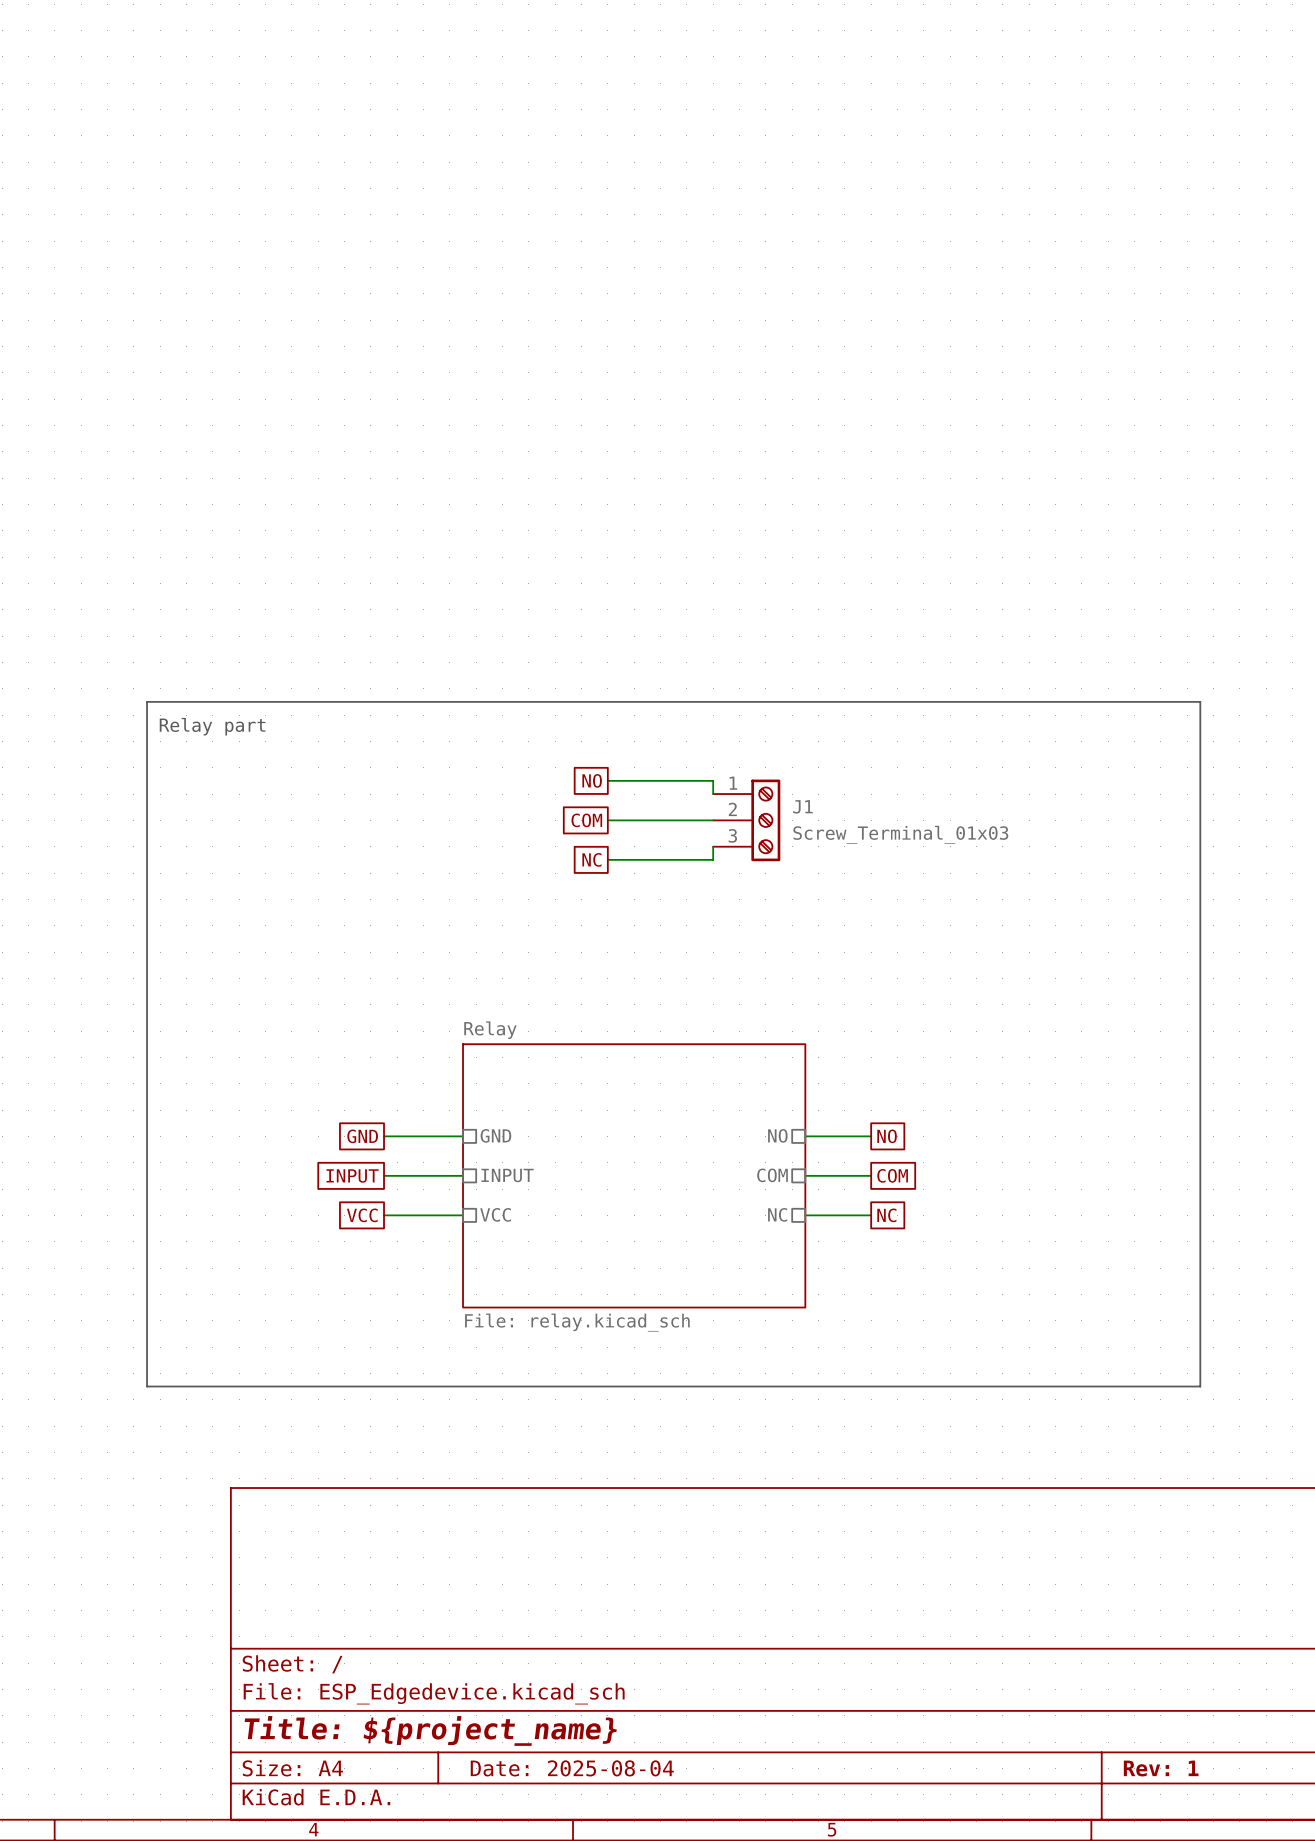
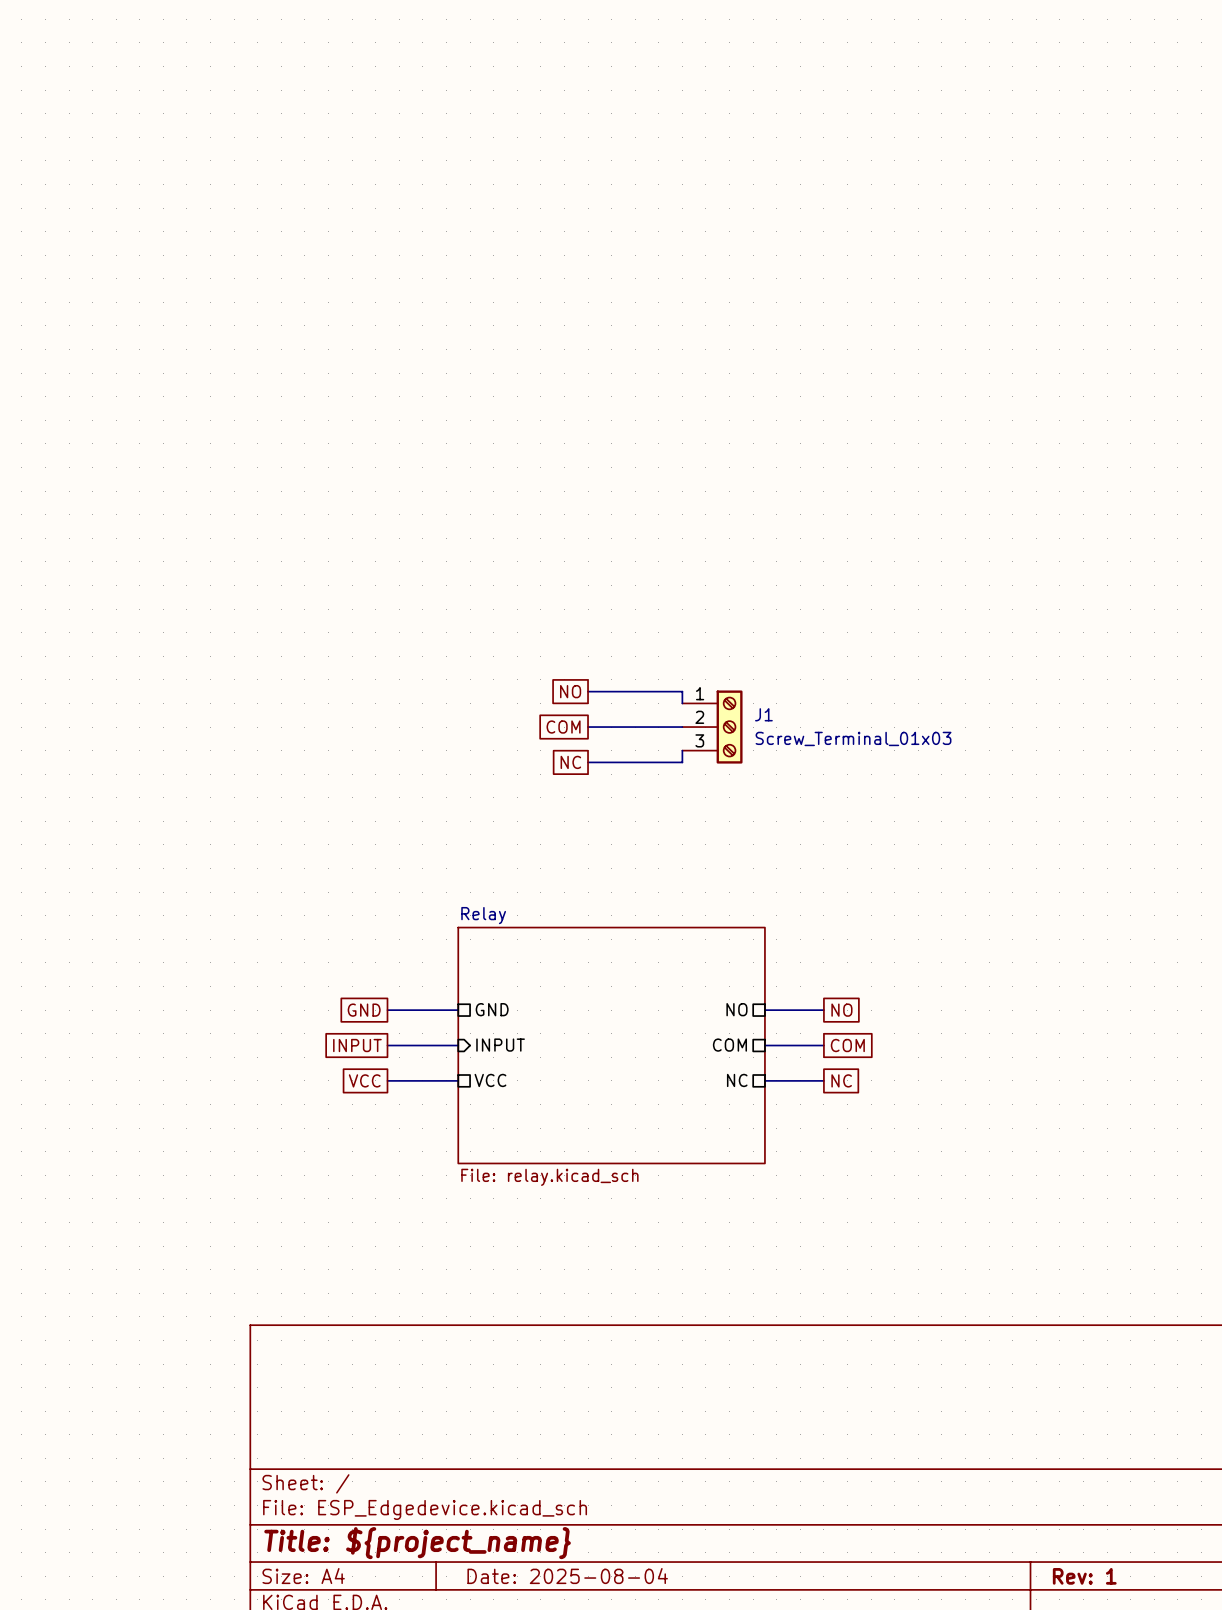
line: (147, 701) (1200, 701) (1200, 1386) (147, 1386) (147, 701) -> none
text: Relay part (212, 726) -> none
sheet pin shape: passive (507, 1175) -> input (500, 1045)

